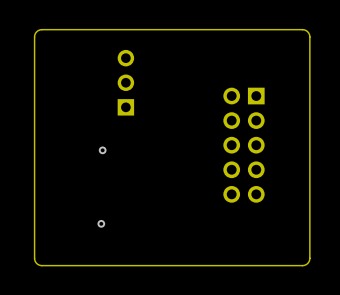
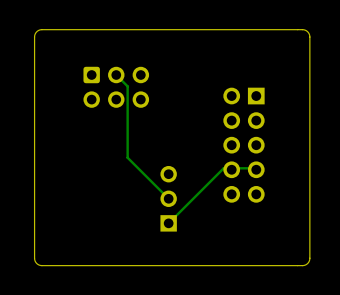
track: none -> (116, 75) (127, 86) (127, 157) (168, 198)
part position: (125, 82) -> (168, 198)
part: none -> (116, 87)
via: (102, 150) -> none
track: none -> (260, 168) (223, 168) (168, 223)
via: (101, 223) -> none

